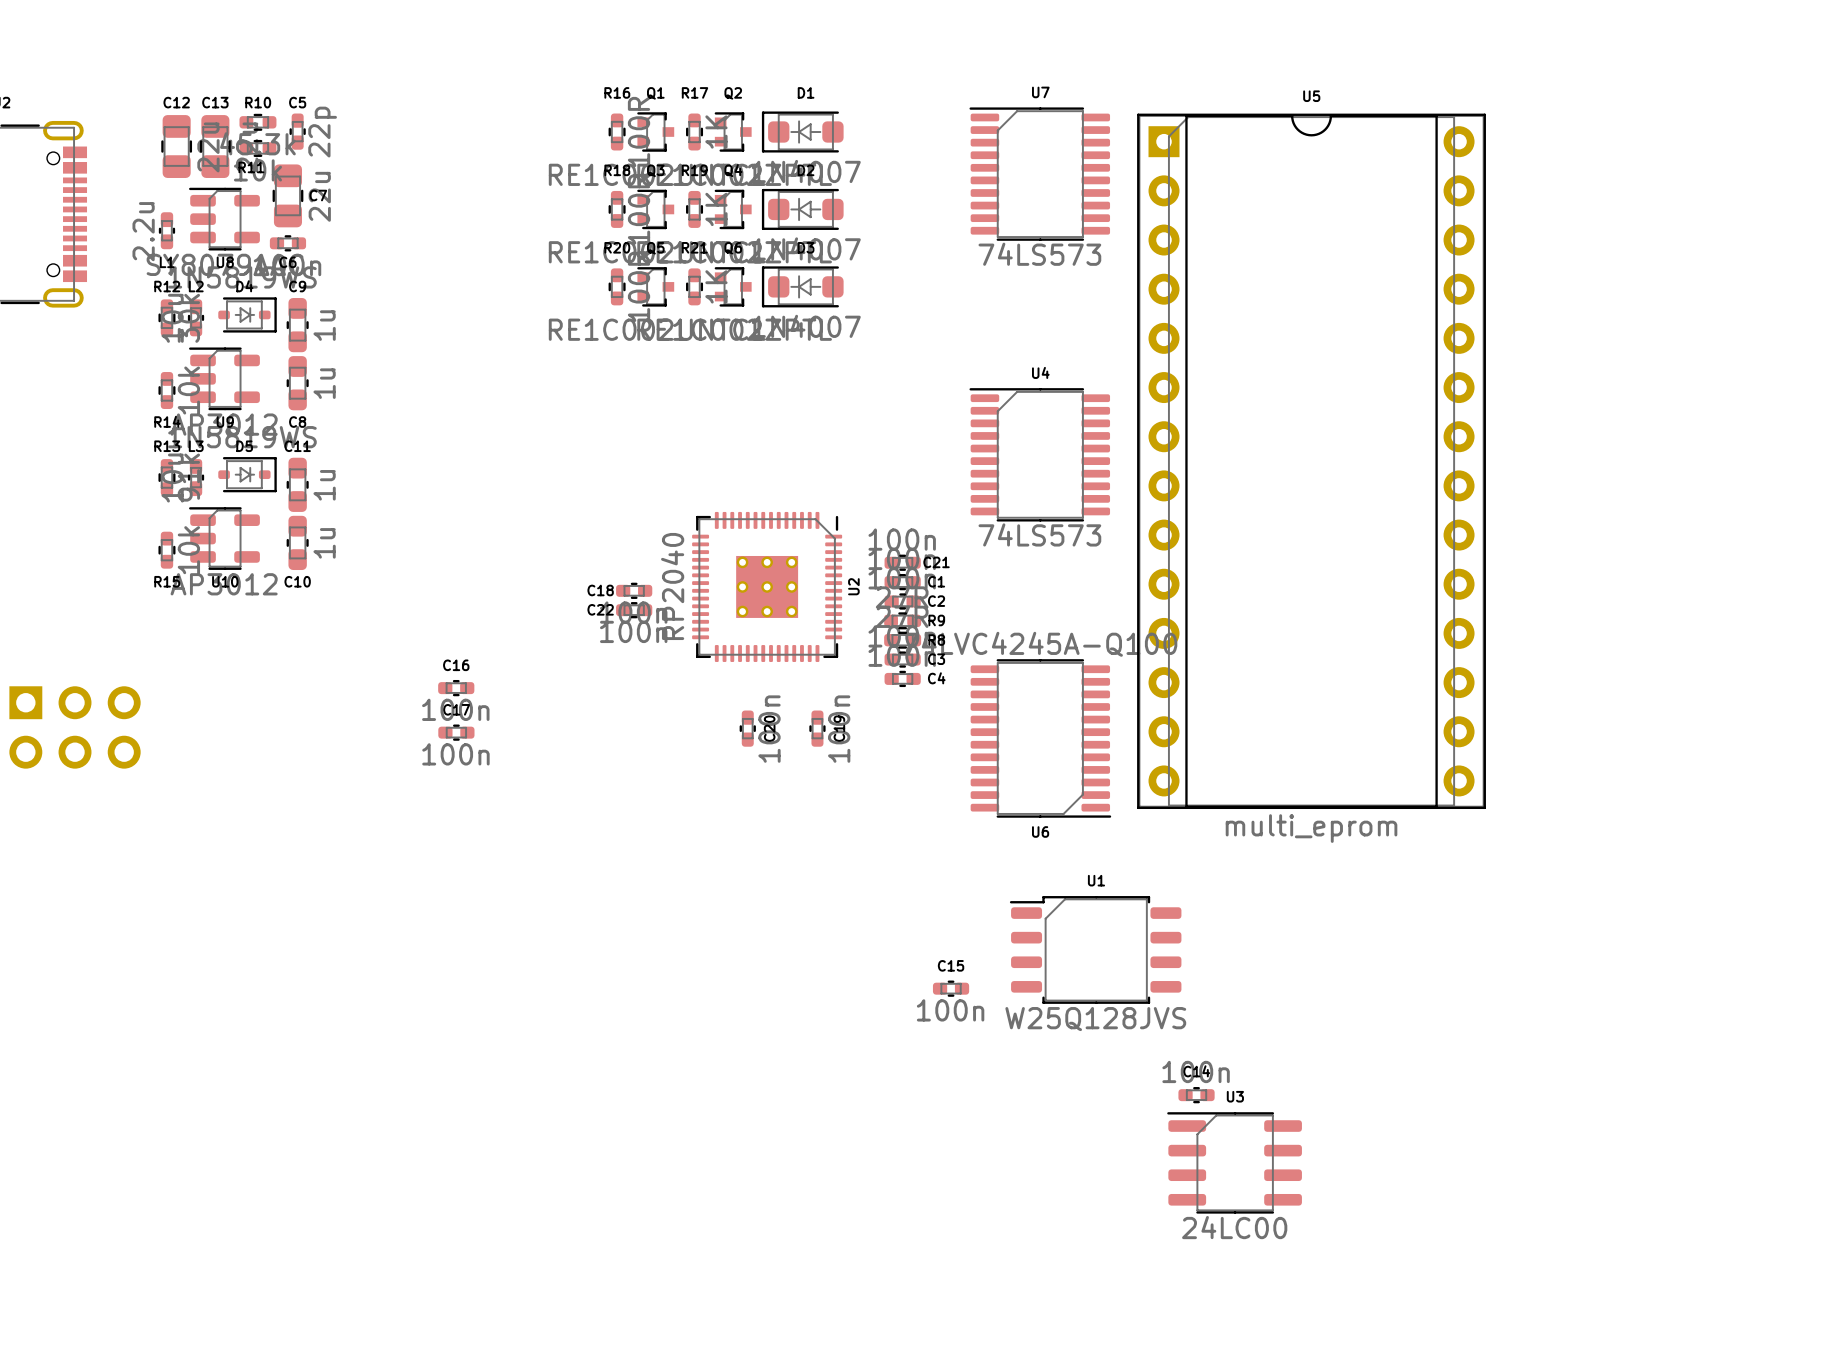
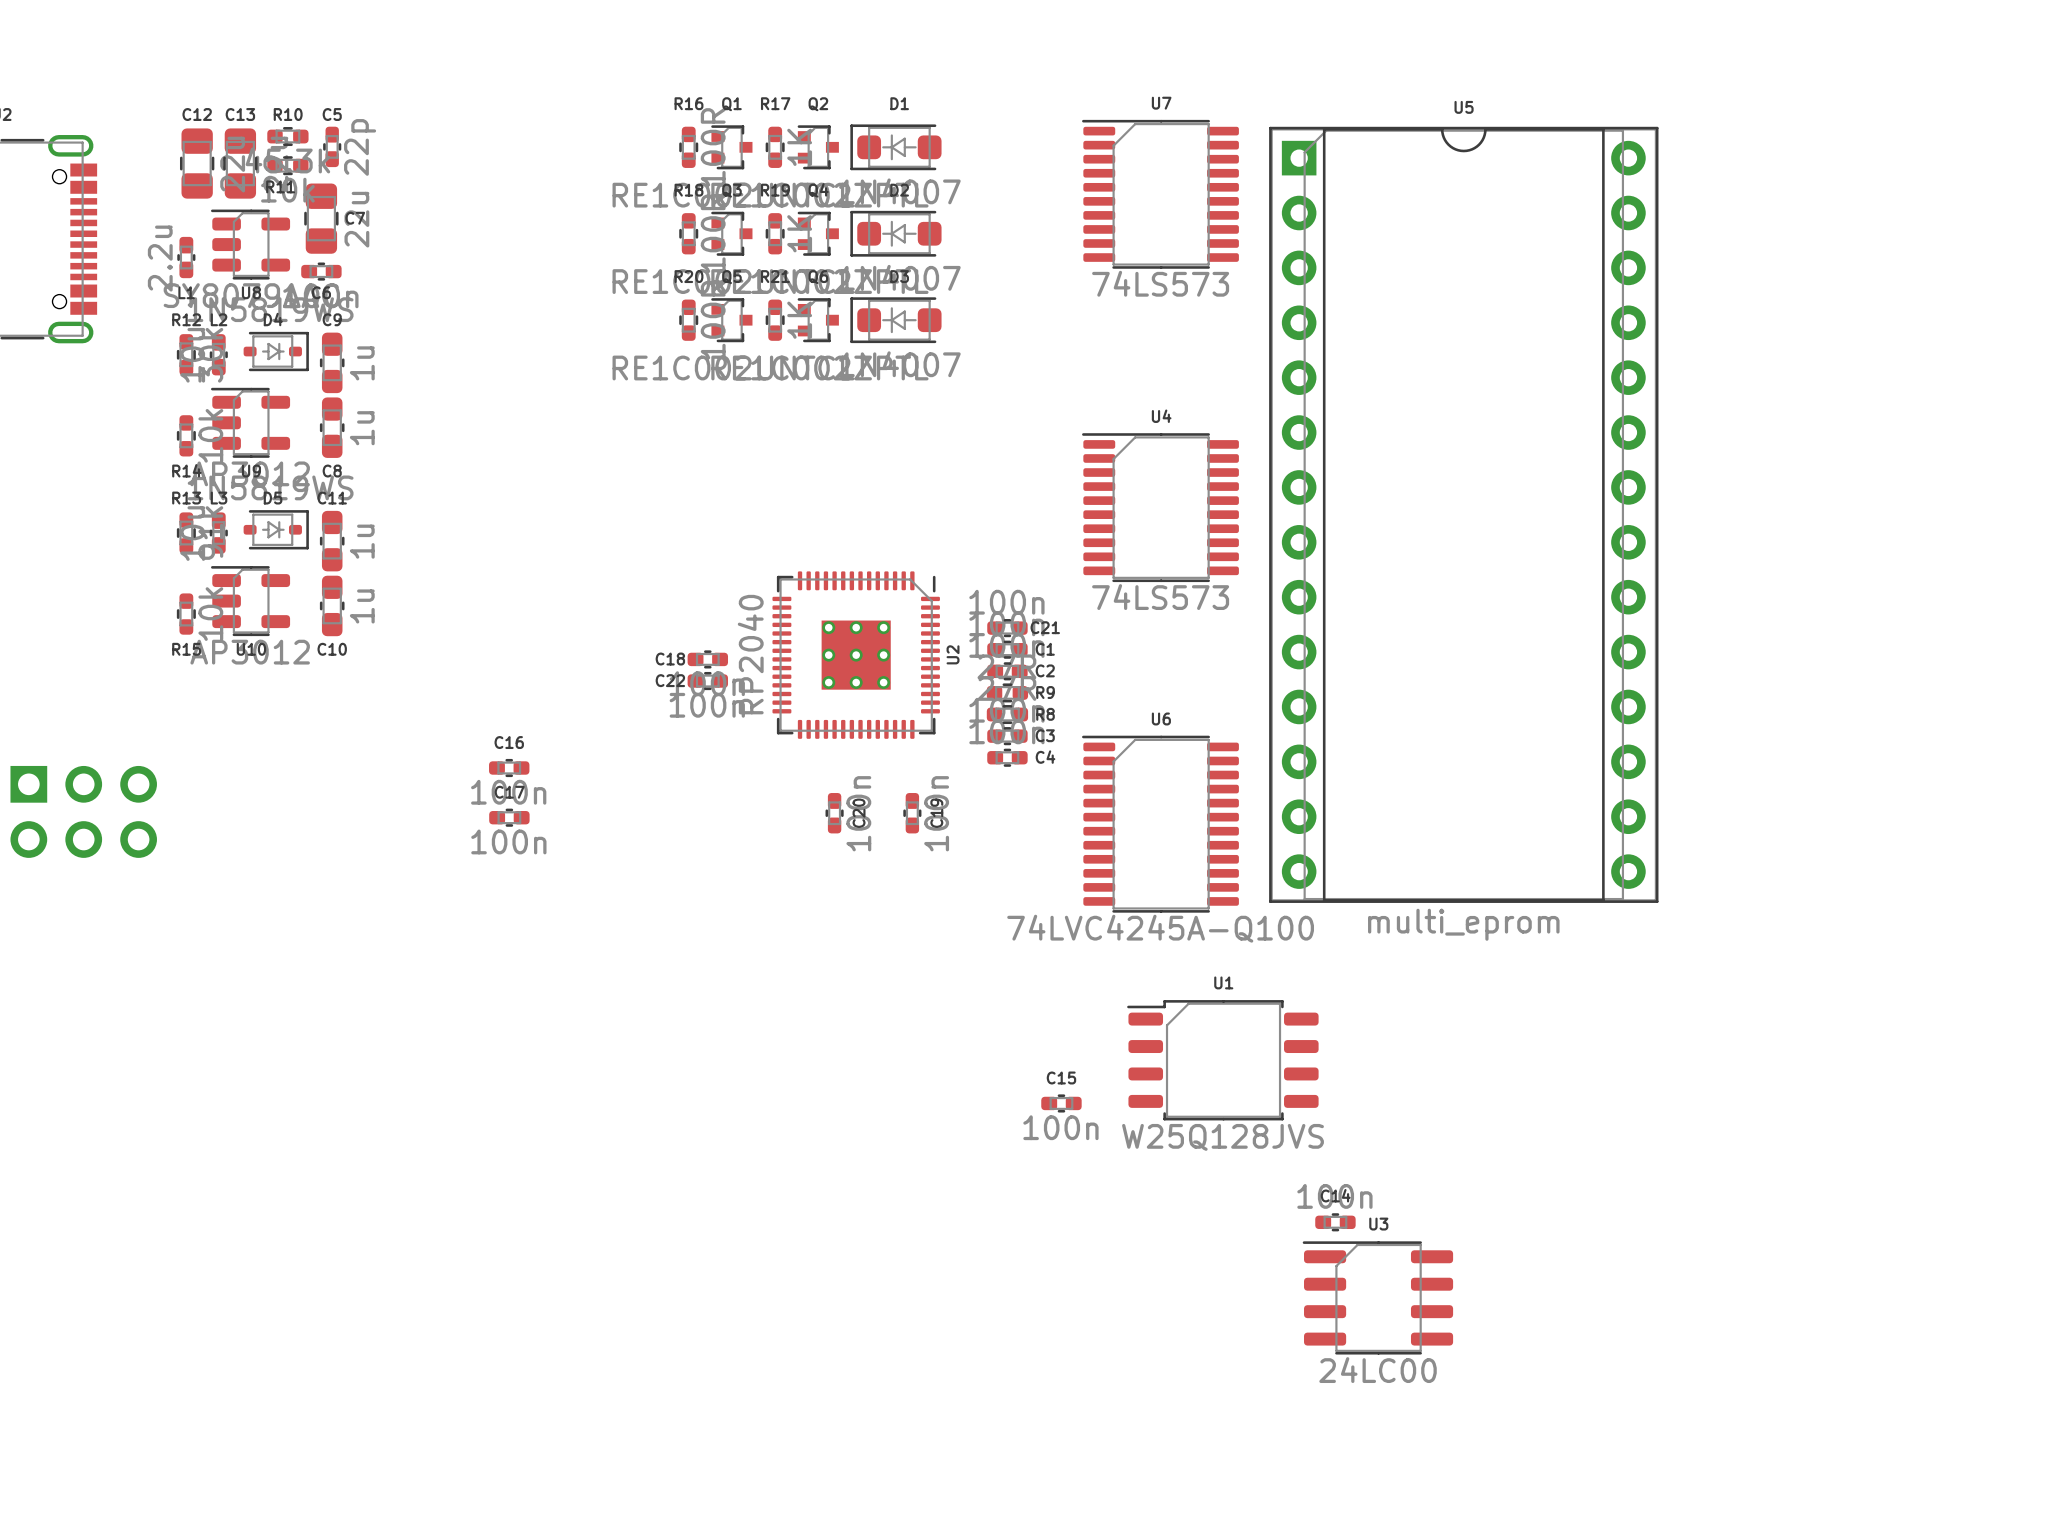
U6 rotation: 0° (1040, 738) -> 180° (1160, 824)

